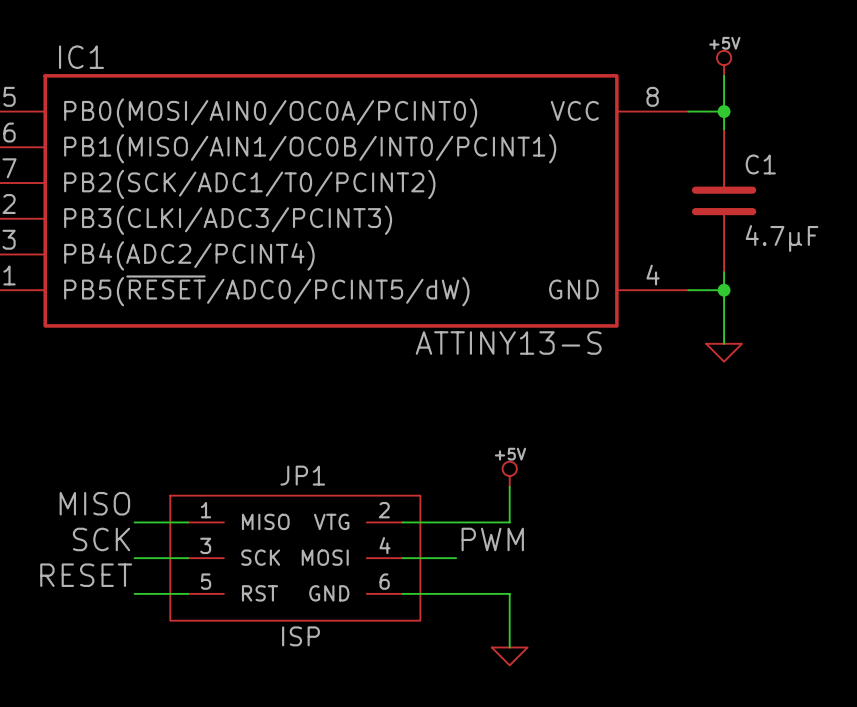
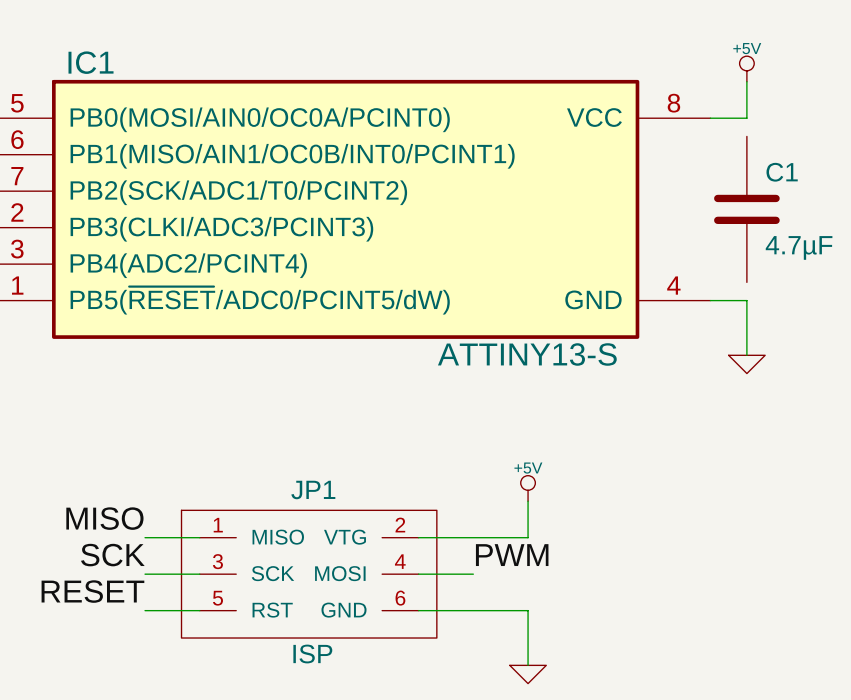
wire: (724, 111) (724, 129) -> none
junction: (724, 111) -> none
wire: (724, 272) (724, 290) -> none
junction: (724, 290) -> none

